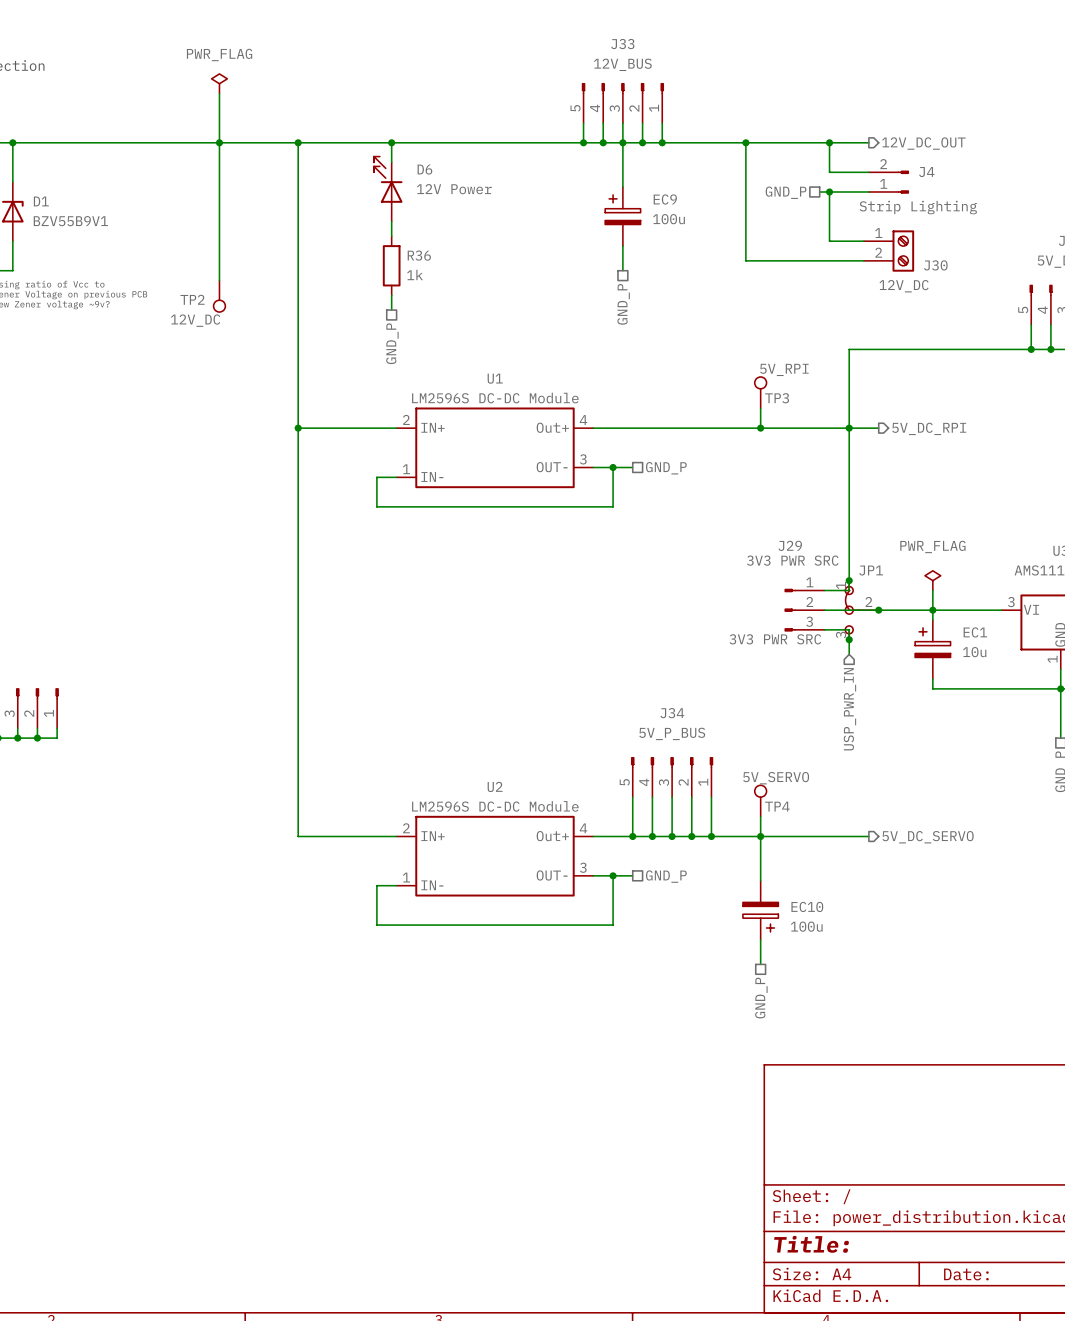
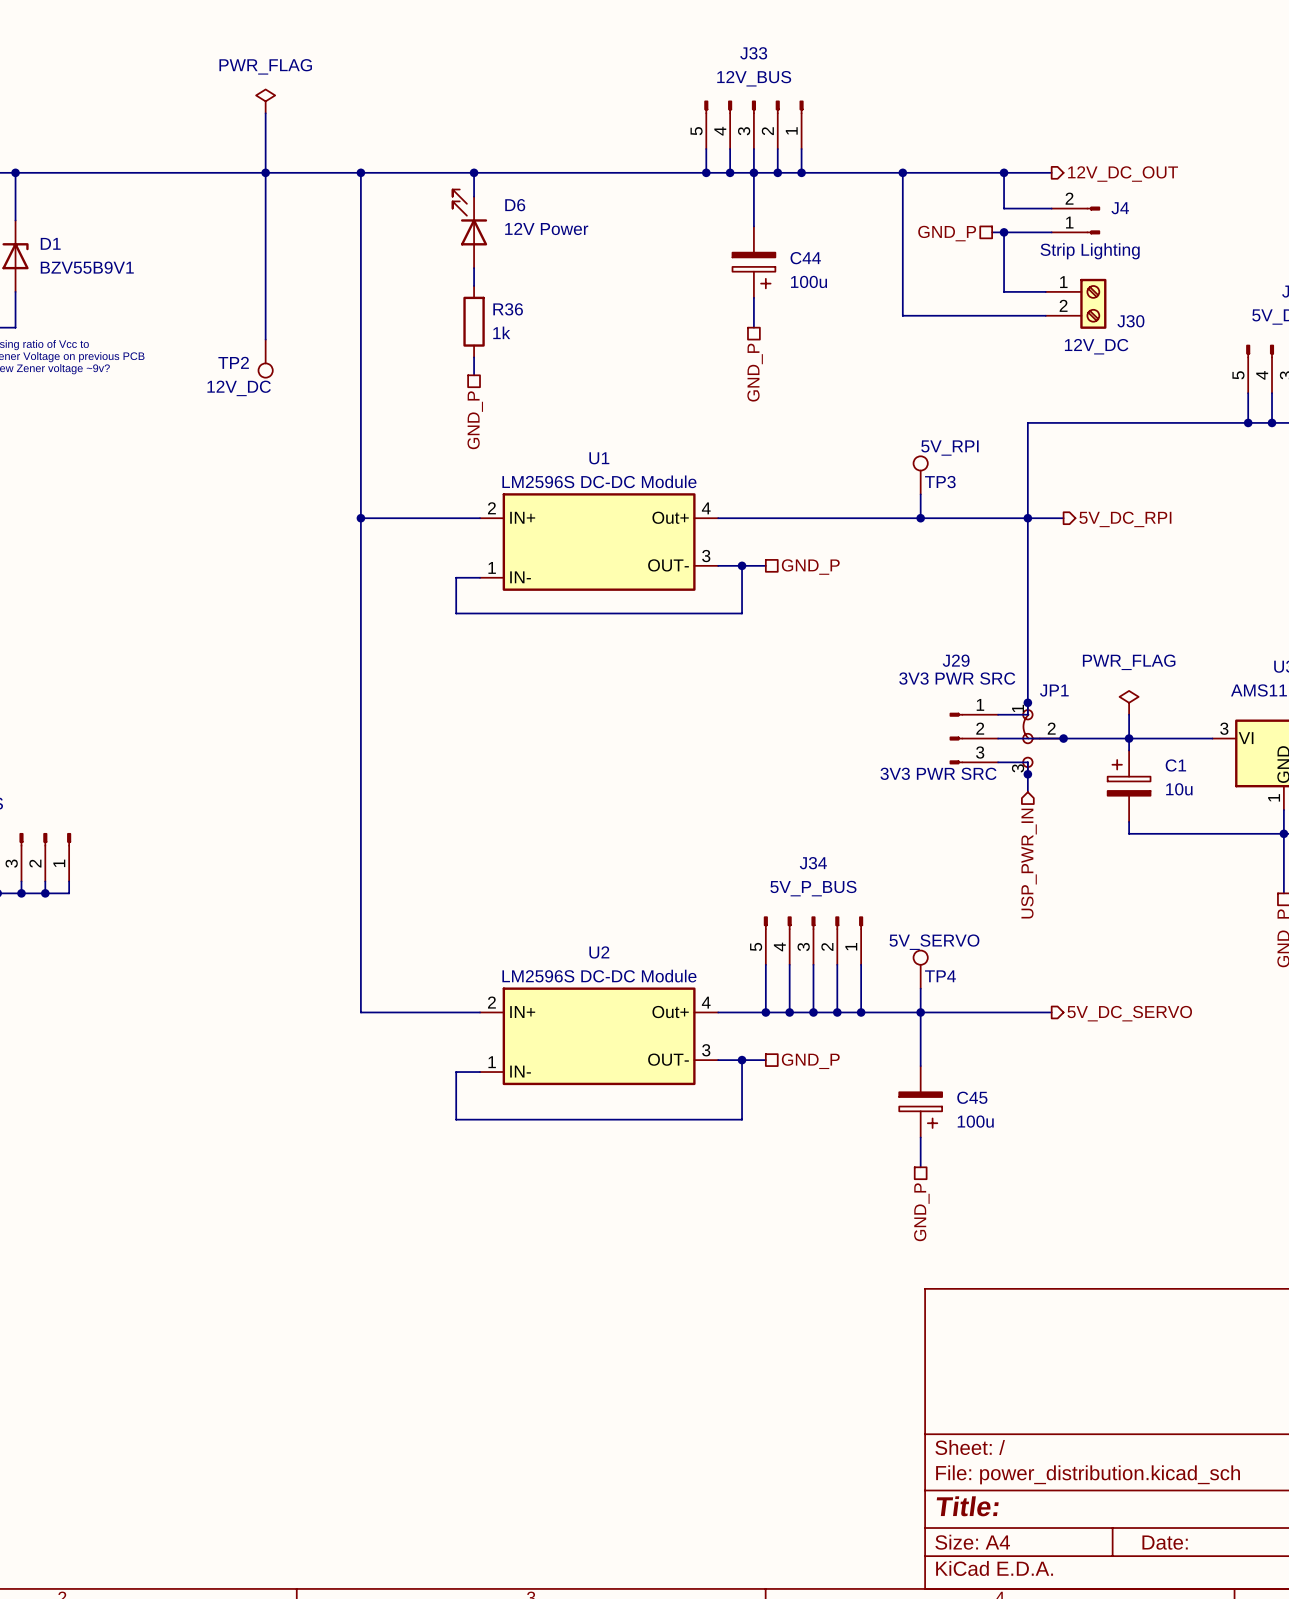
EC9: 100u (622, 216) -> none
C44: none -> 100u (753, 262)
EC1 name: EC1 (975, 632) -> C1 (1175, 765)
EC10 name: EC10 (807, 906) -> C45 (972, 1097)

